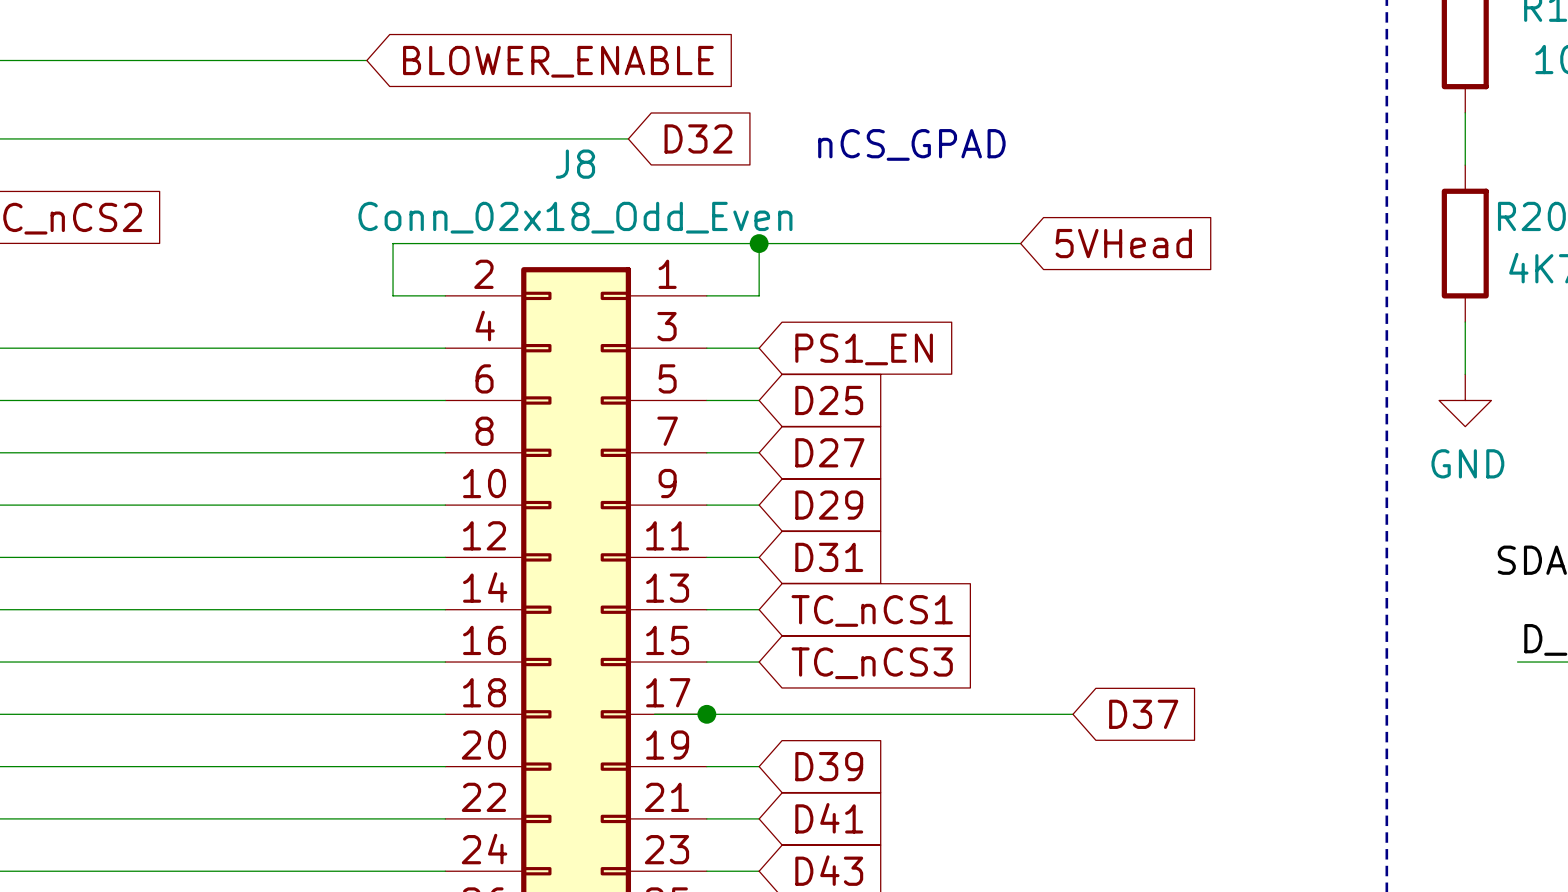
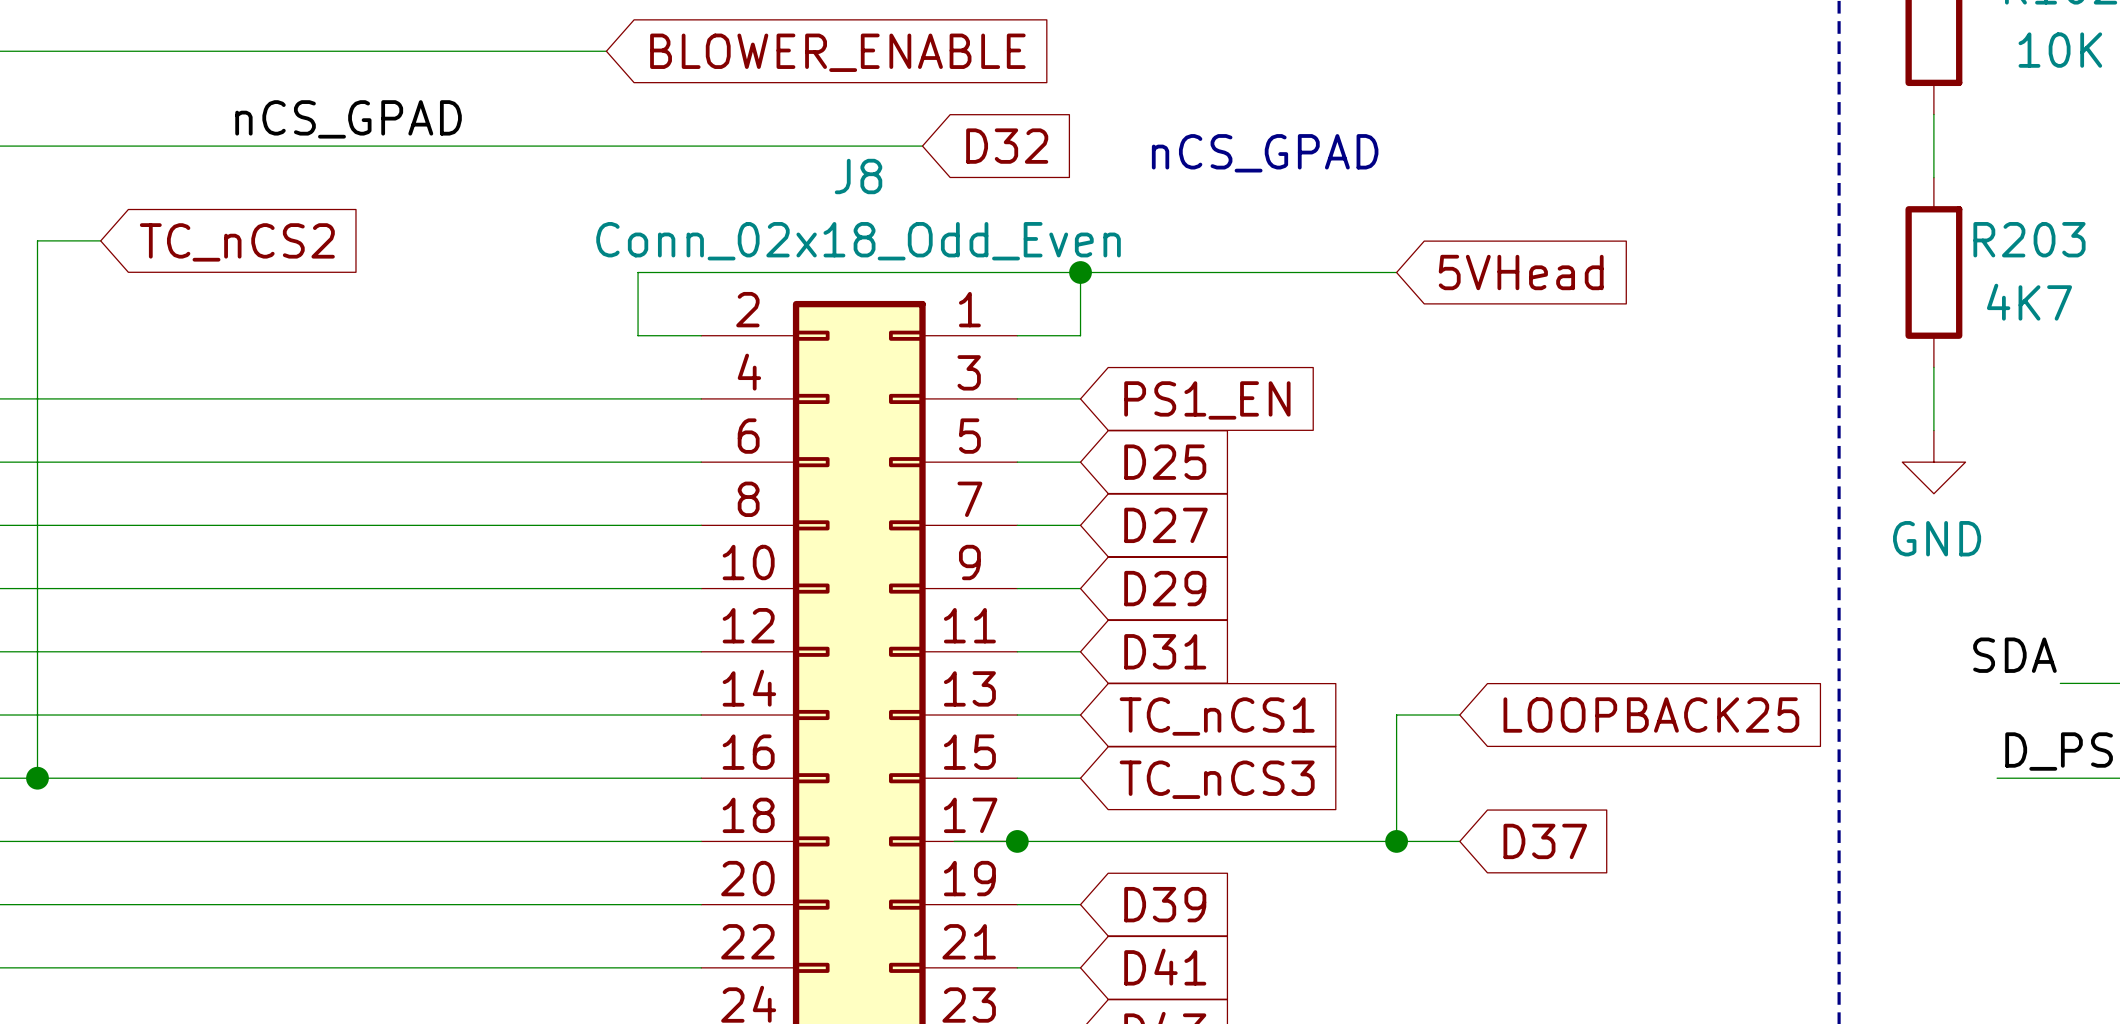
label: none -> nCS_GPAD (348, 119)
wire: none -> (1459, 715) (1396, 715) (1396, 841)
global label: none -> LOOPBACK25 (1651, 715)
junction: none -> (1396, 841)

